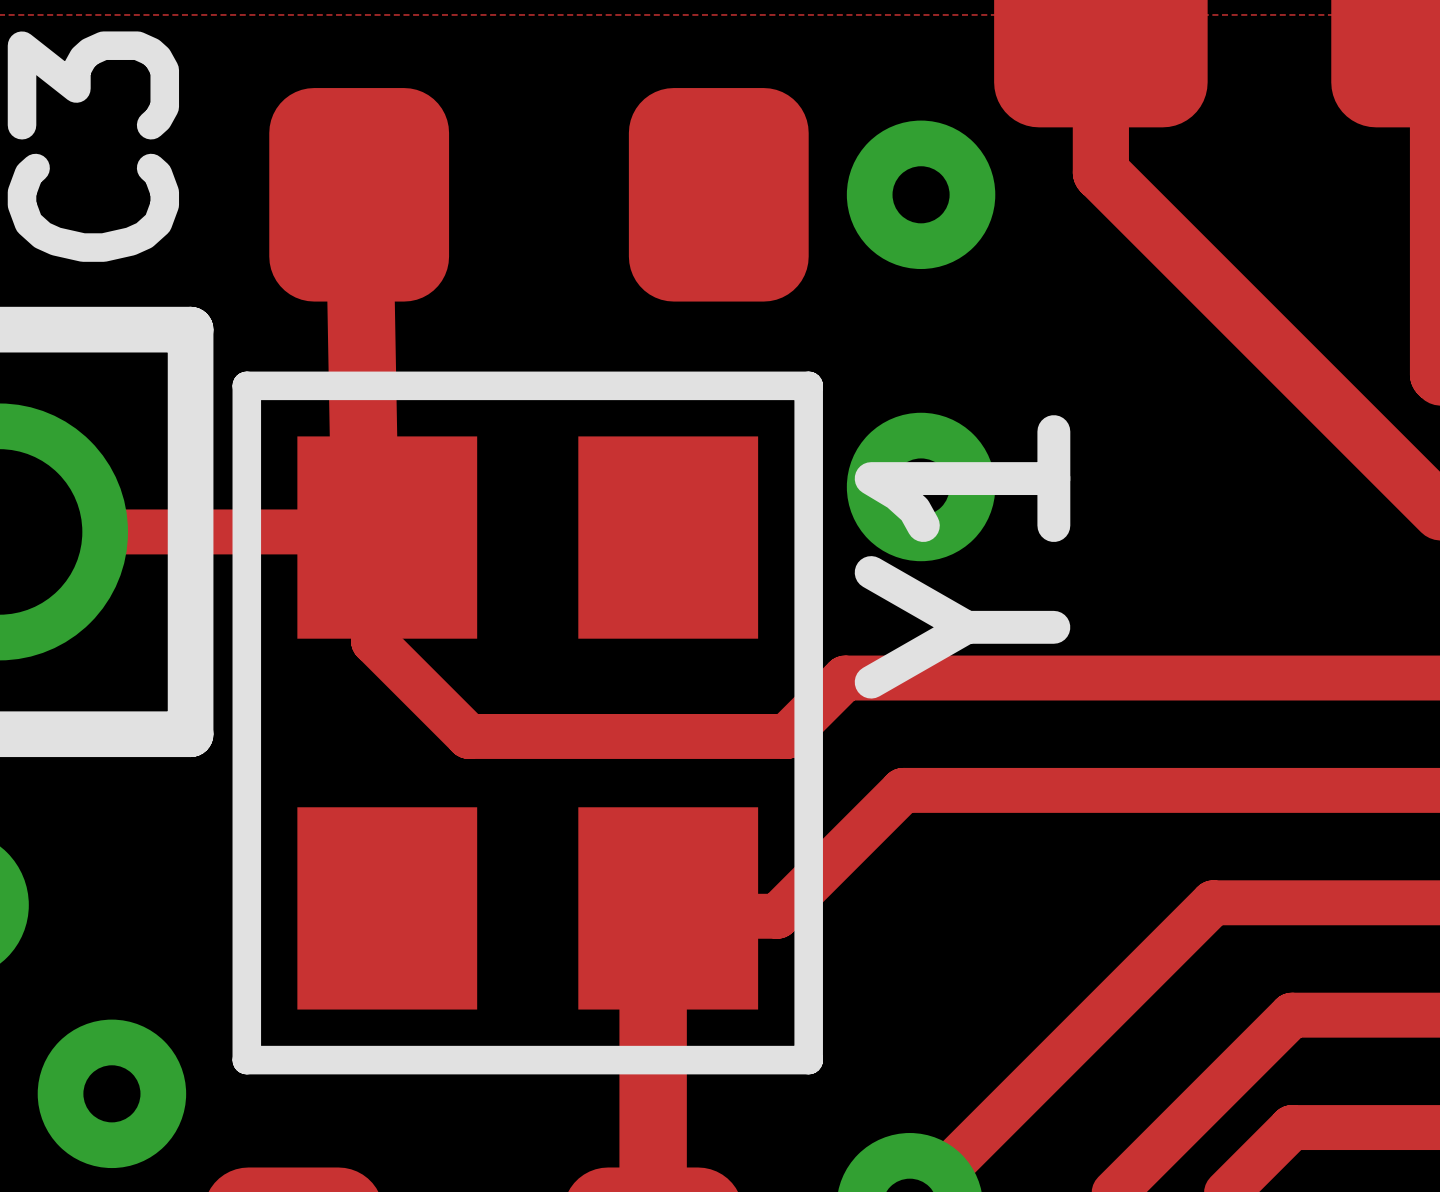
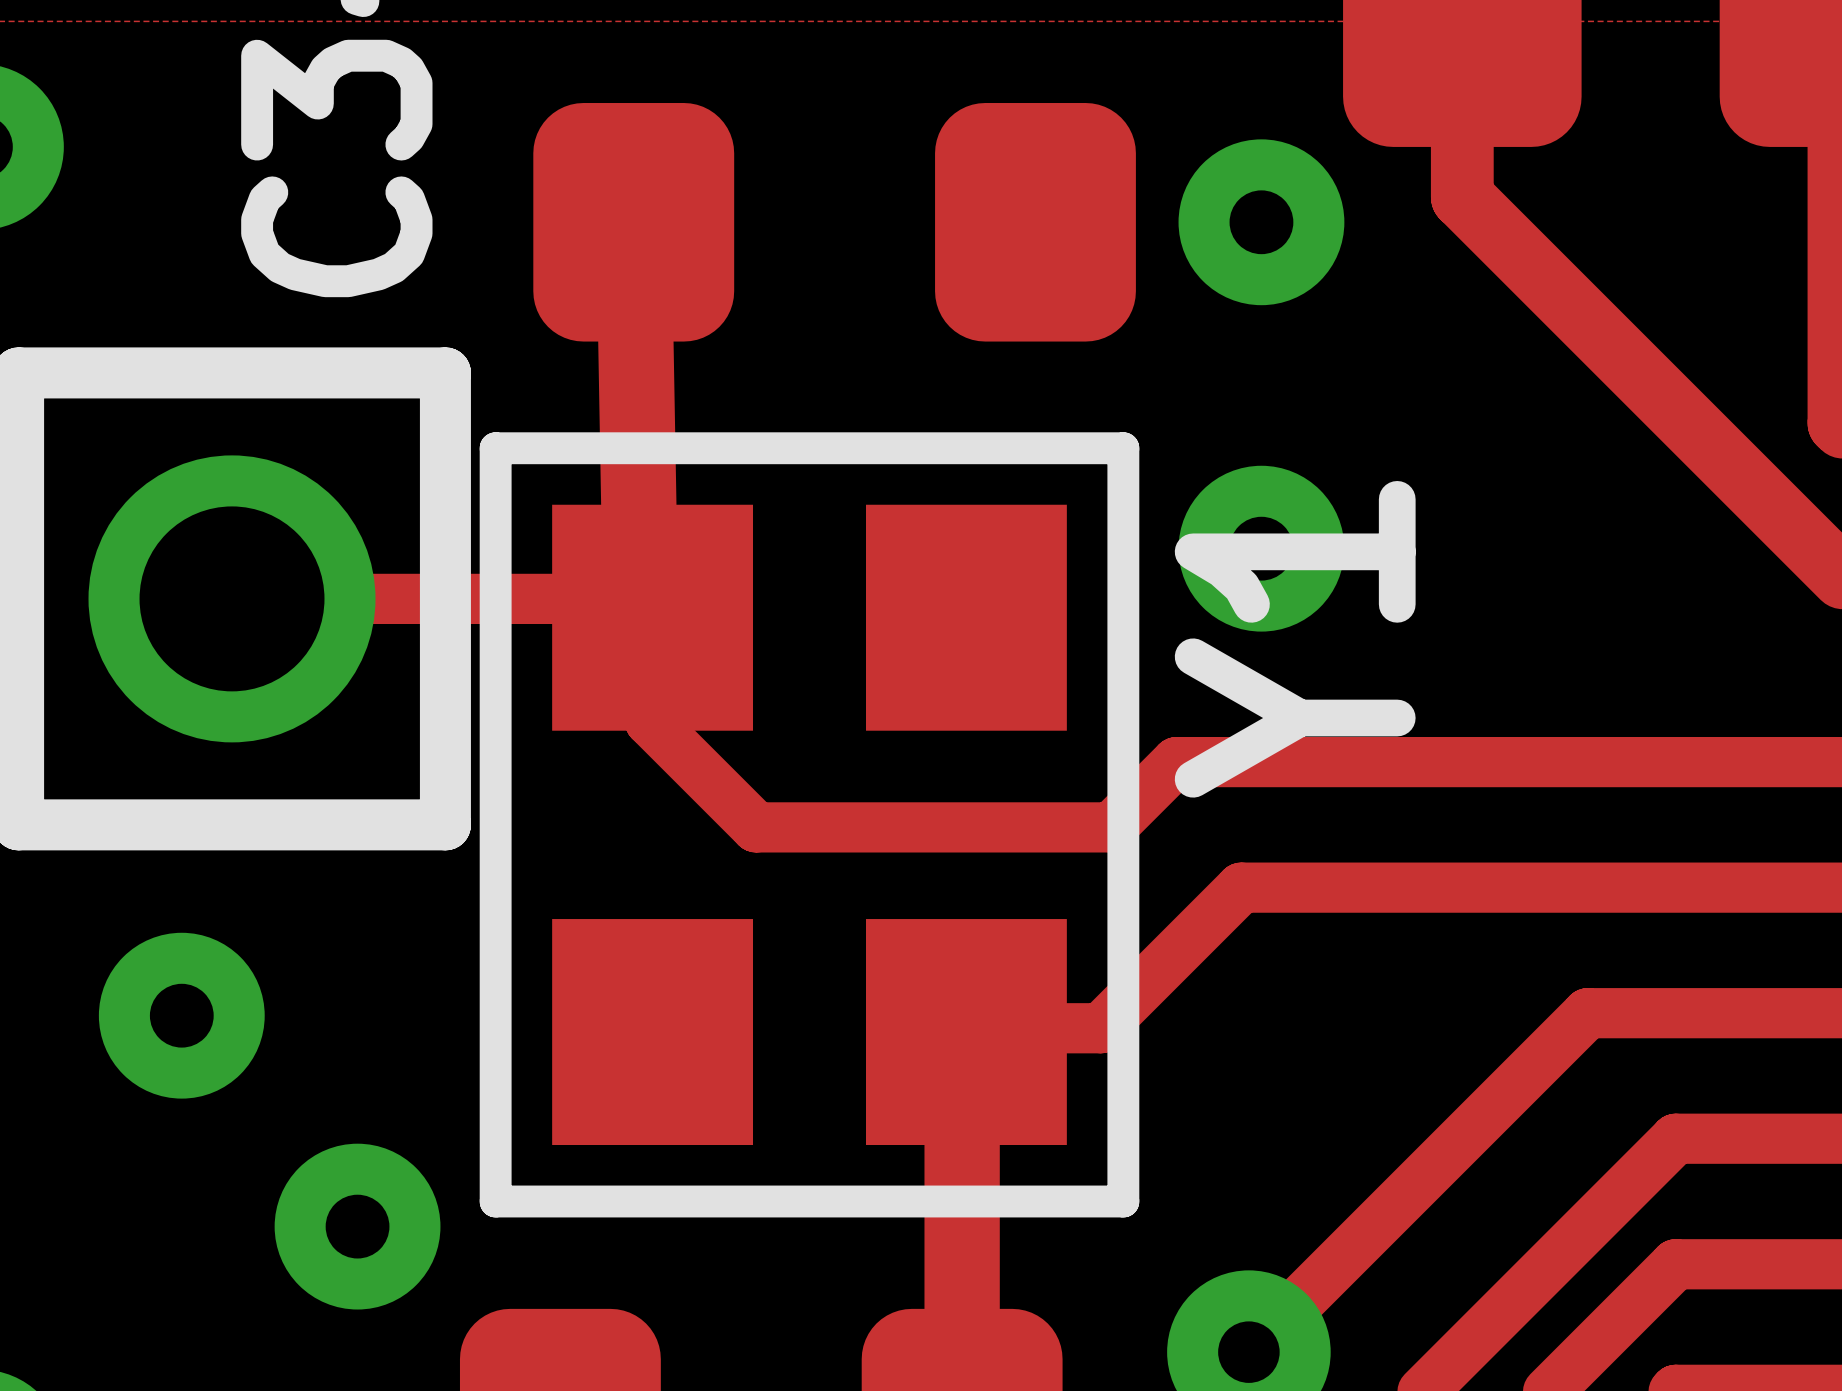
Y1 position: (527, 722) -> (809, 824)

